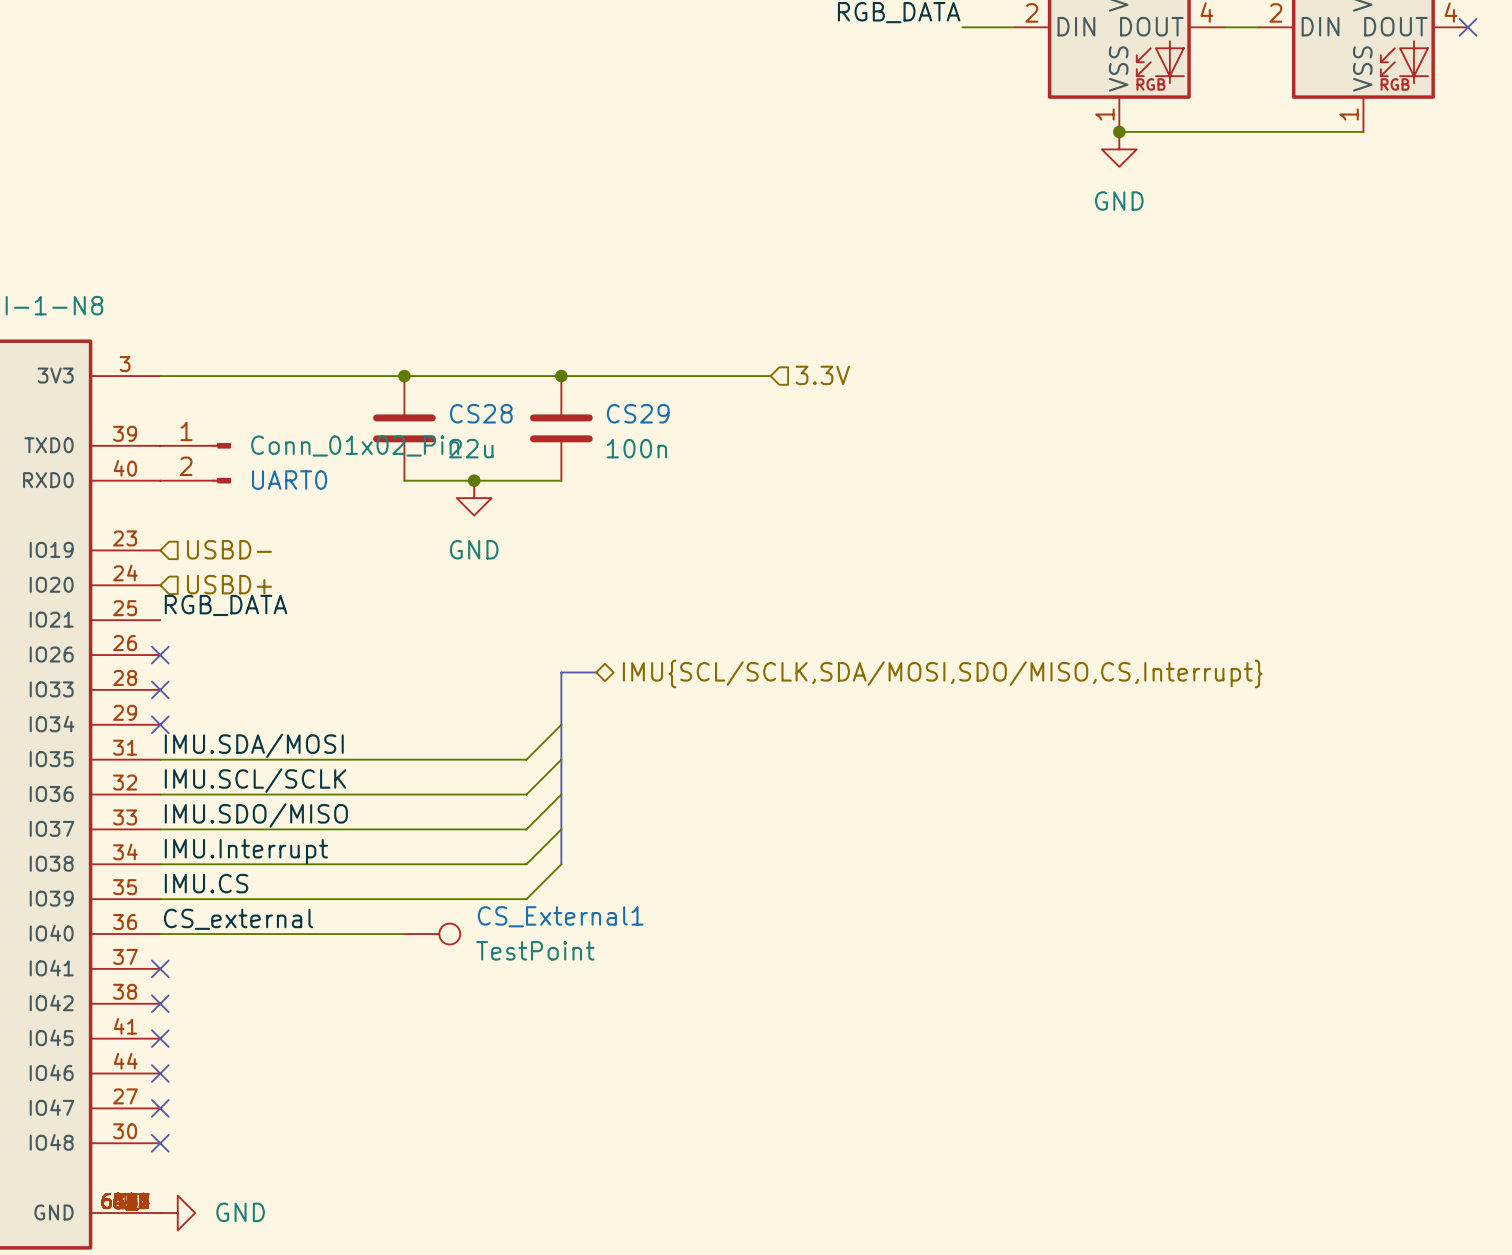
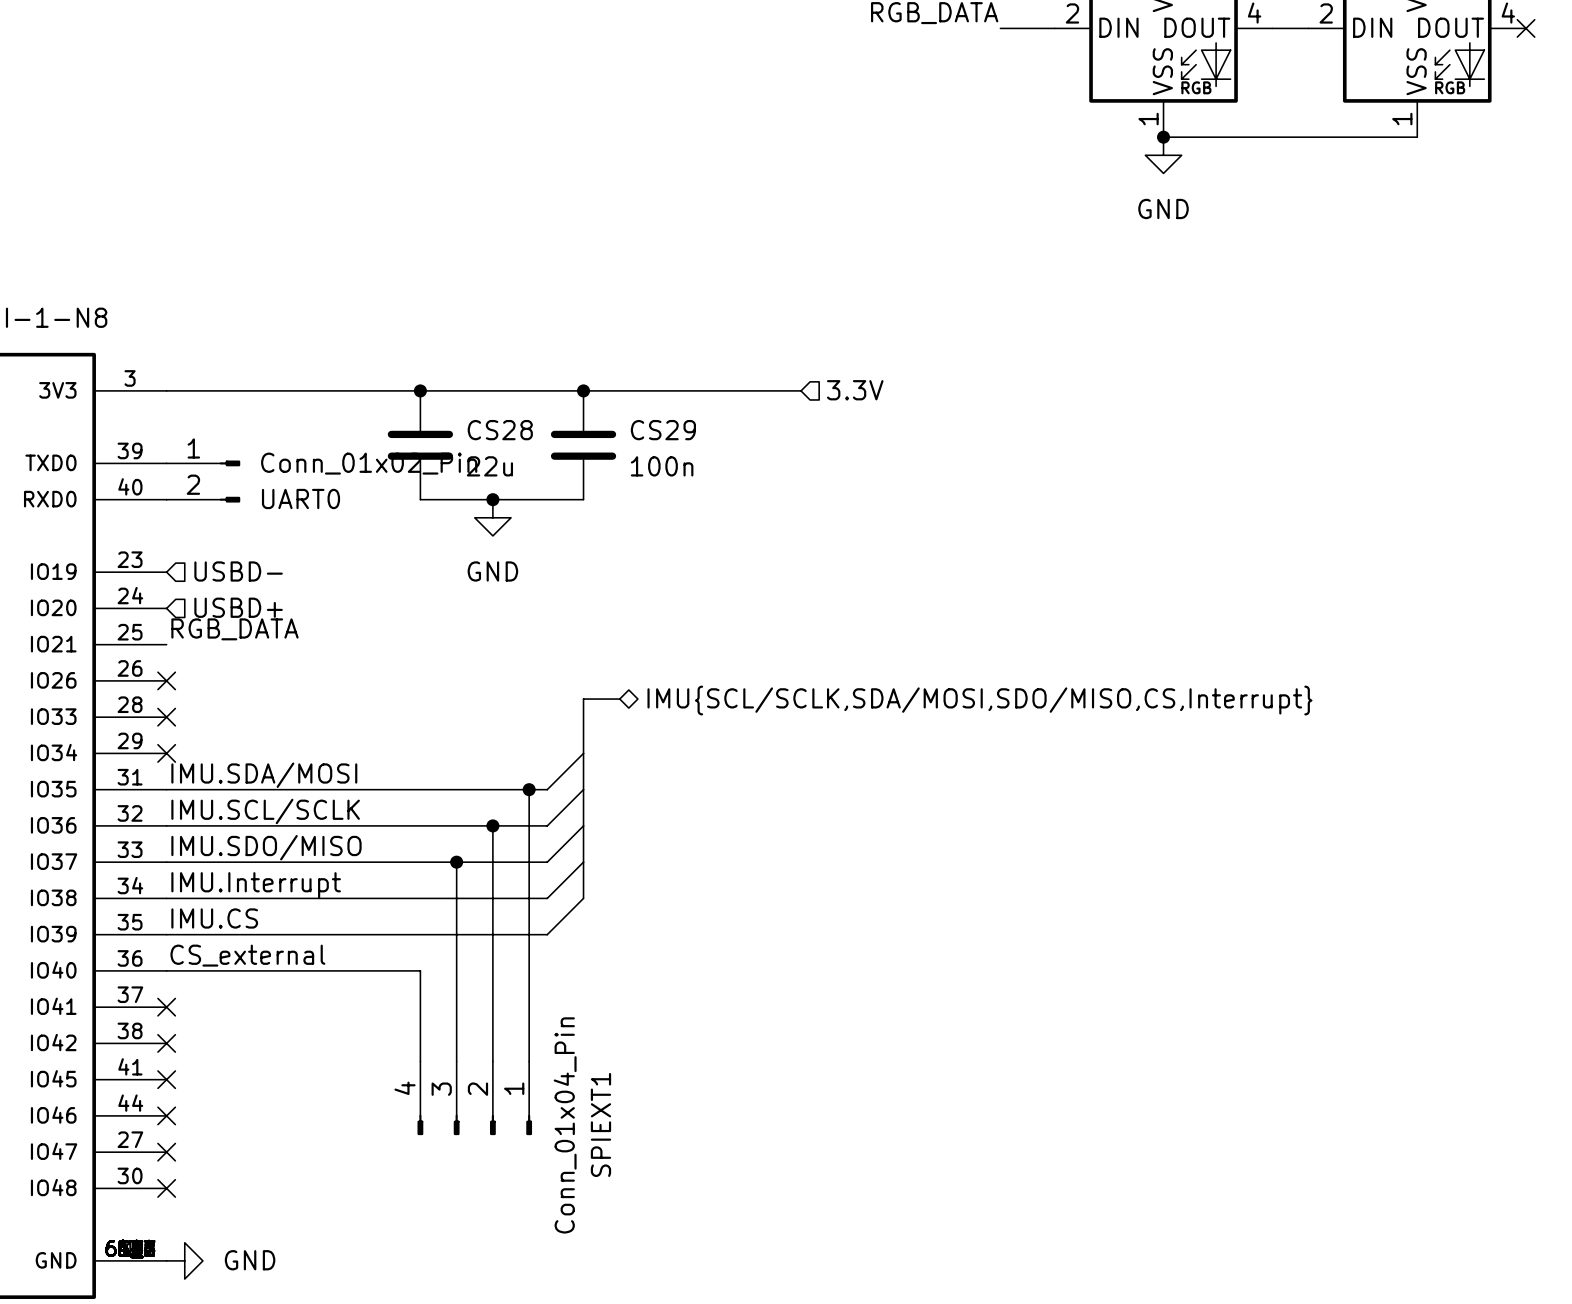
wire: none -> (529, 789) (529, 1061)
junction: none -> (529, 789)
wire: none -> (492, 825) (492, 1061)
junction: none -> (492, 825)
wire: none -> (456, 862) (456, 1061)
junction: none -> (456, 862)
wire: none -> (420, 970) (420, 1061)
CS_External1: TestPoint (432, 934) -> none
SPIEXT1: none -> Conn_01x04_Pin (474, 1098)

